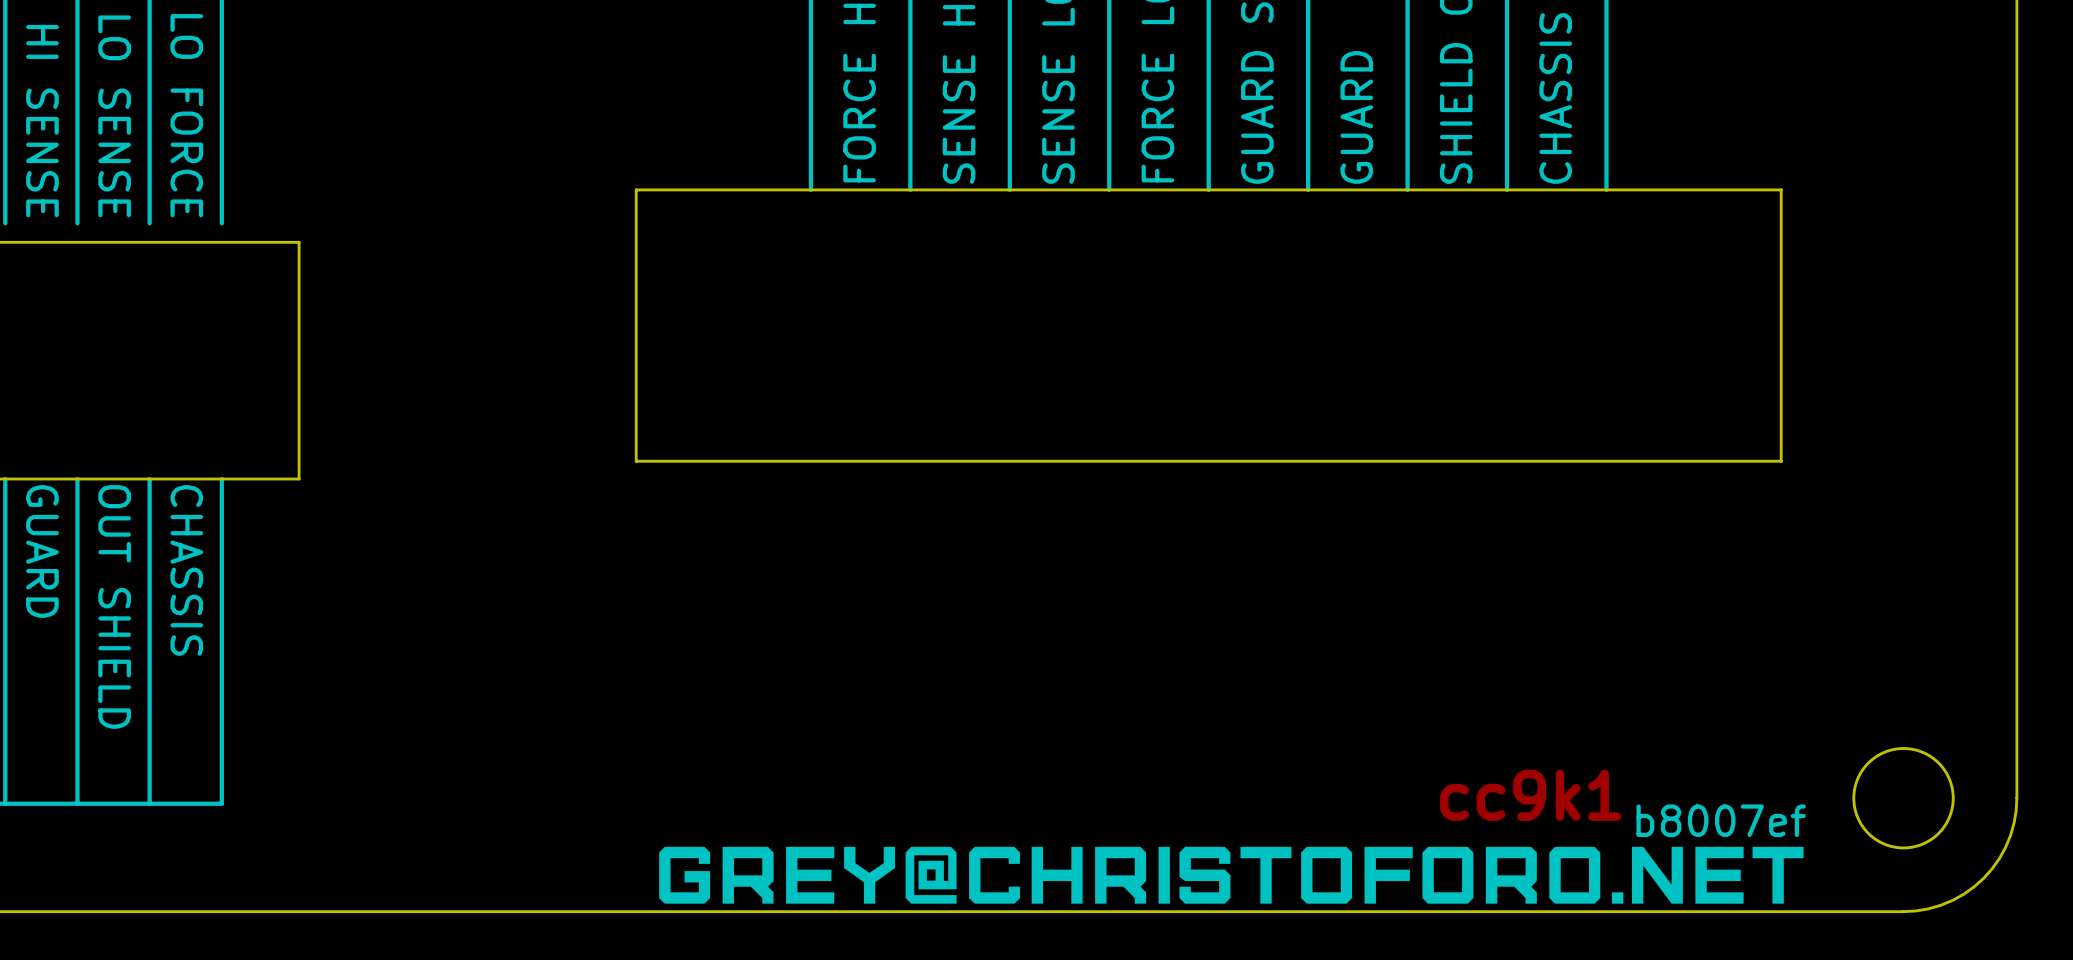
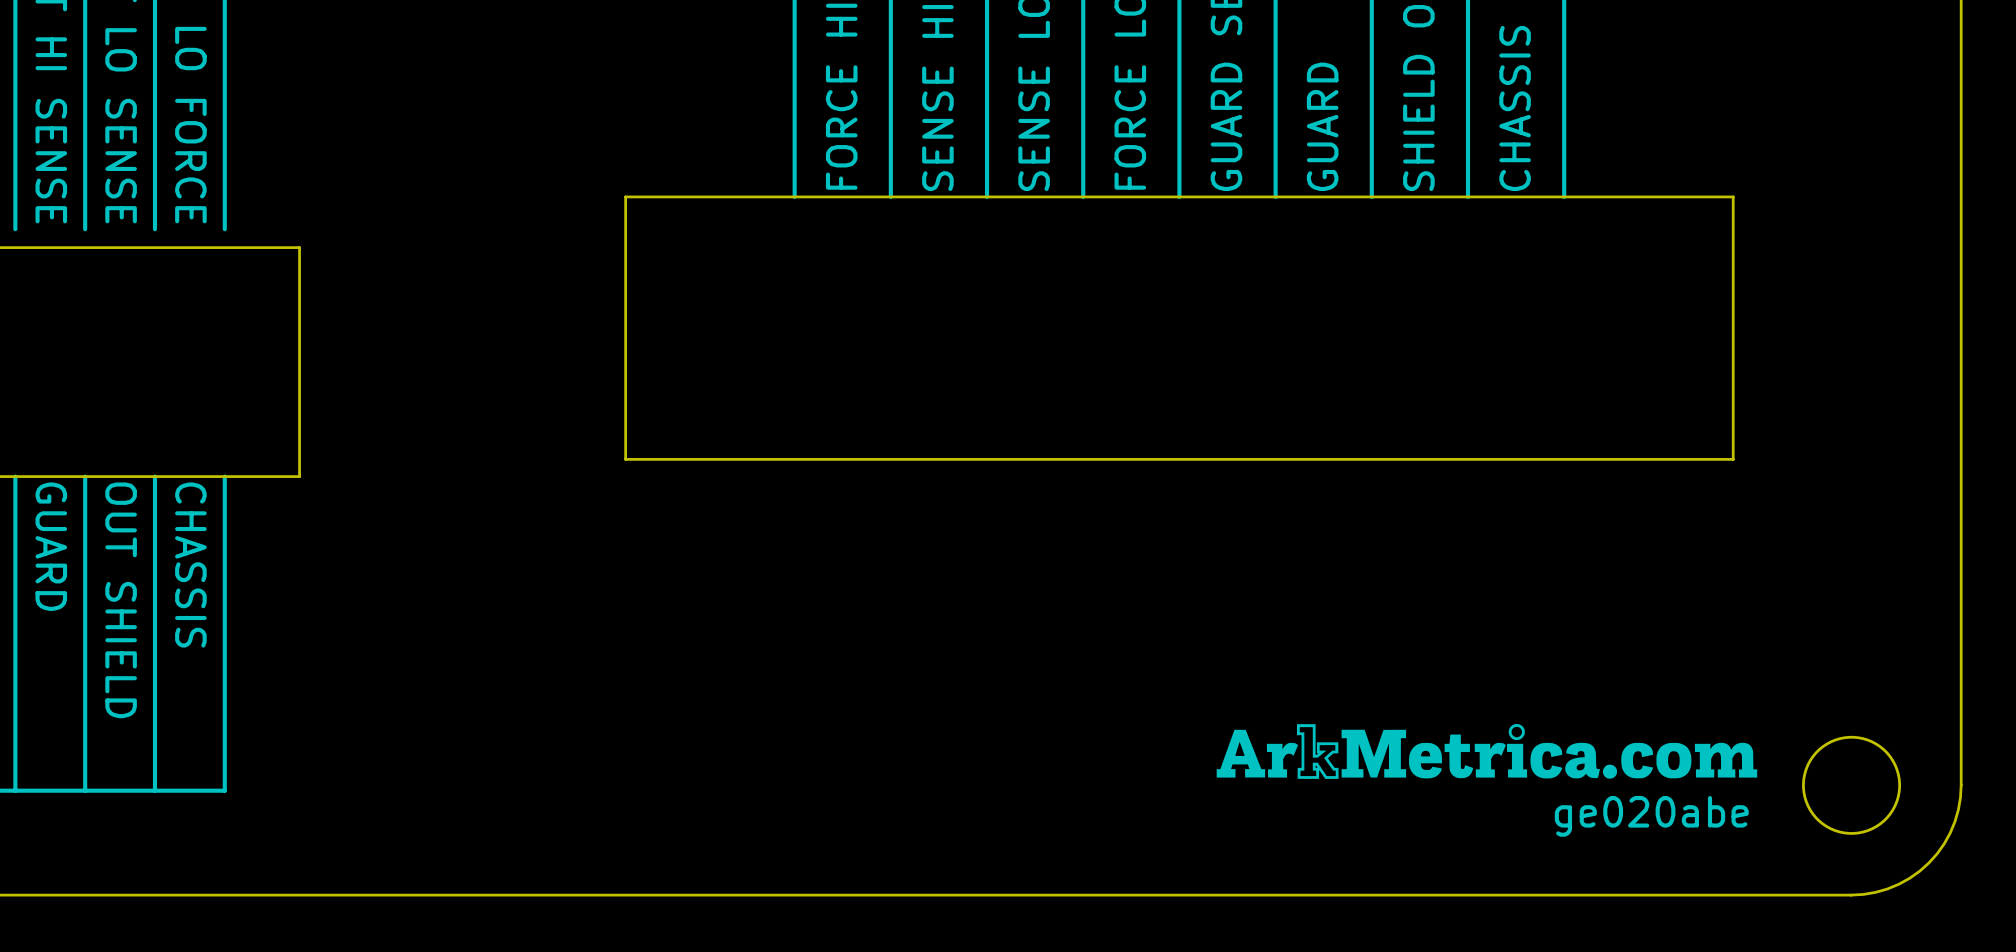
drawing: none -> [1216, 724, 1758, 779]
text: cc9k1 (1530, 795) -> none
text: b8007ef (1721, 820) -> none
text: none -> ge020abe (1651, 816)
drawing: [659, 846, 1804, 904] -> none

